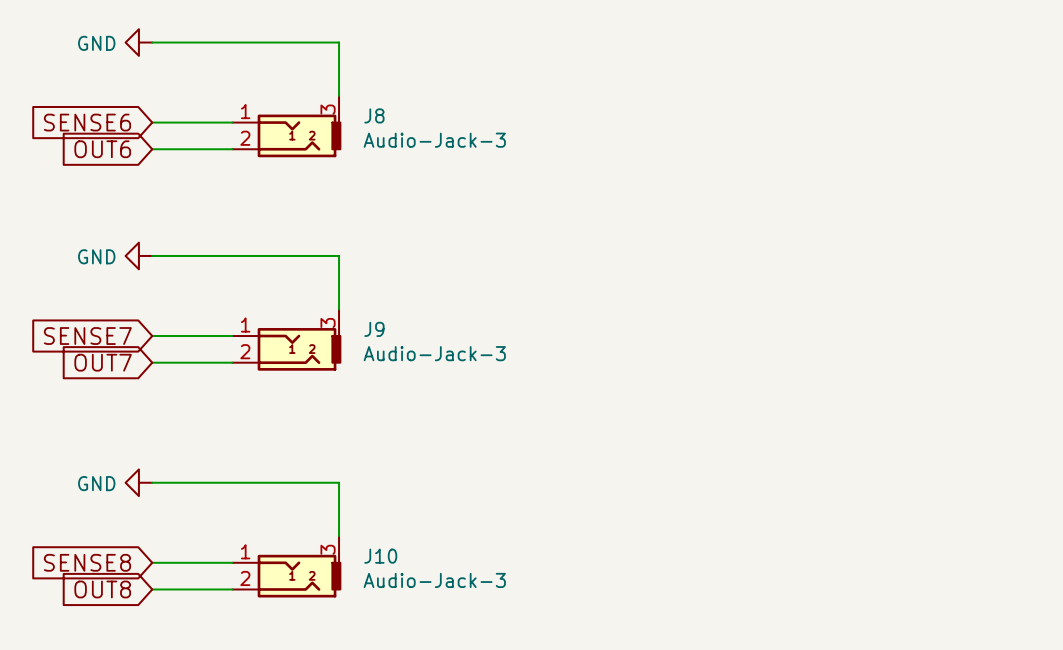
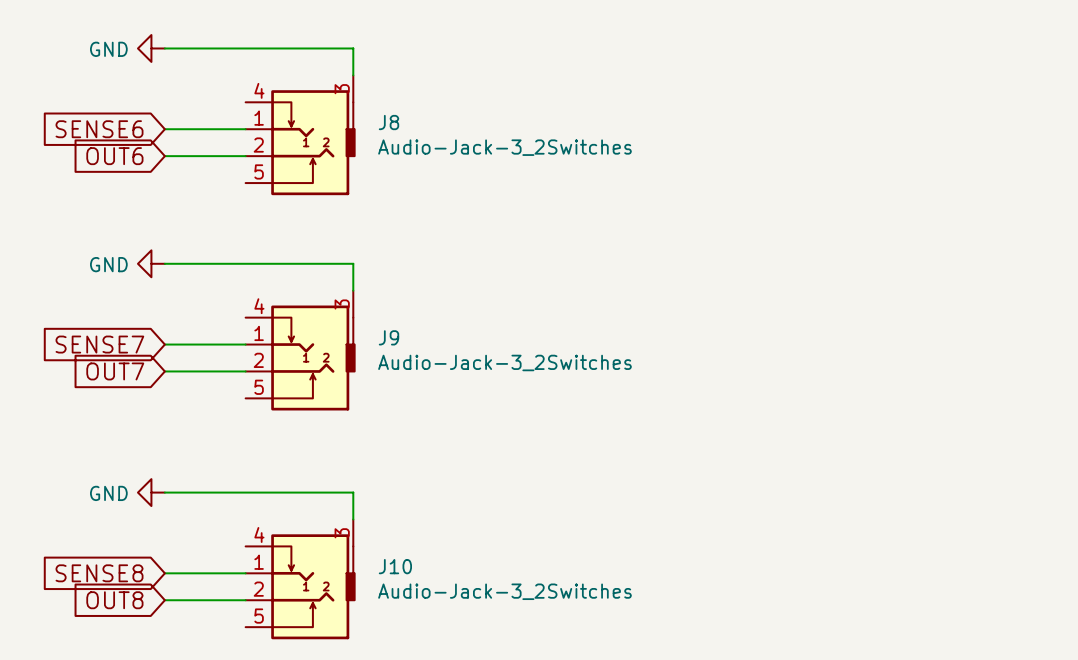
J8 symbol: [232, 95, 341, 158] -> [245, 75, 355, 196]
J8 value: Audio-Jack-3 (434, 140) -> Audio-Jack-3_2Switches (504, 147)
J9 symbol: [232, 309, 341, 371] -> [245, 290, 355, 411]
J9 value: Audio-Jack-3 (434, 353) -> Audio-Jack-3_2Switches (504, 362)
J10 symbol: [232, 536, 341, 598] -> [245, 519, 355, 640]
J10 value: Audio-Jack-3 (434, 580) -> Audio-Jack-3_2Switches (504, 591)

